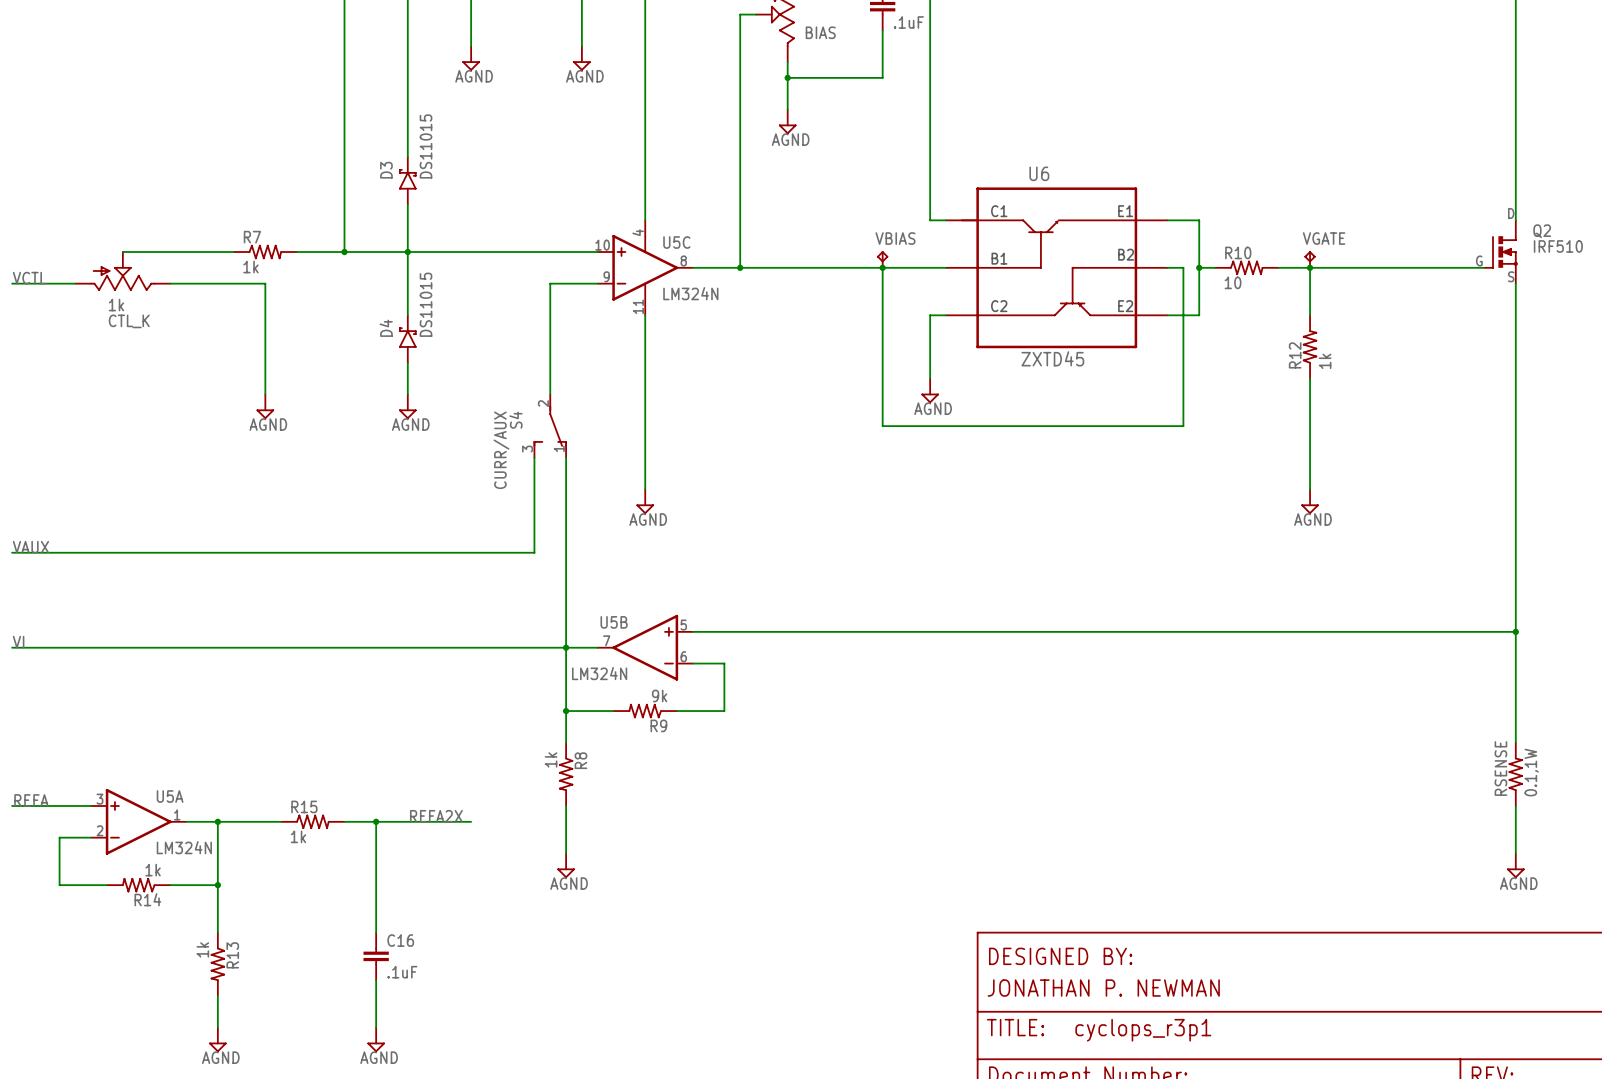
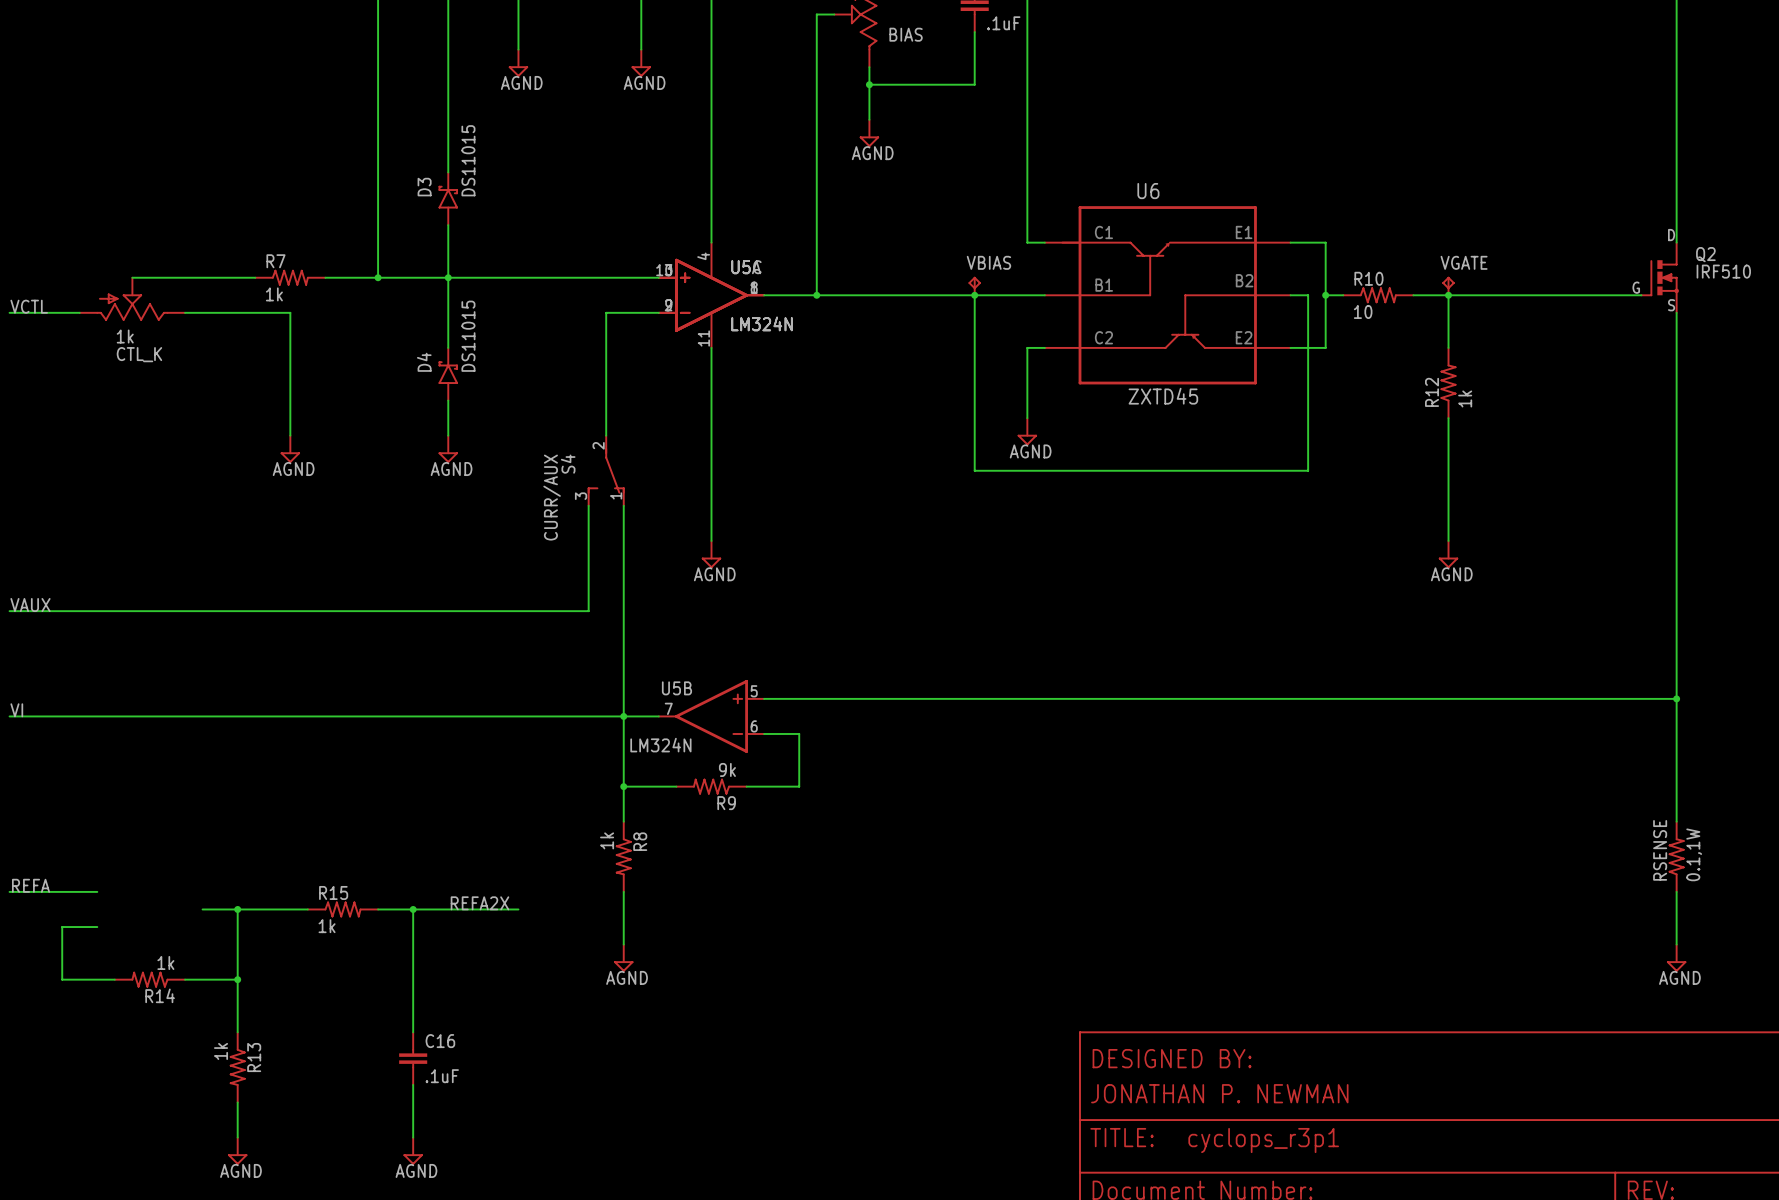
U5A position: (138, 821) -> (711, 295)

